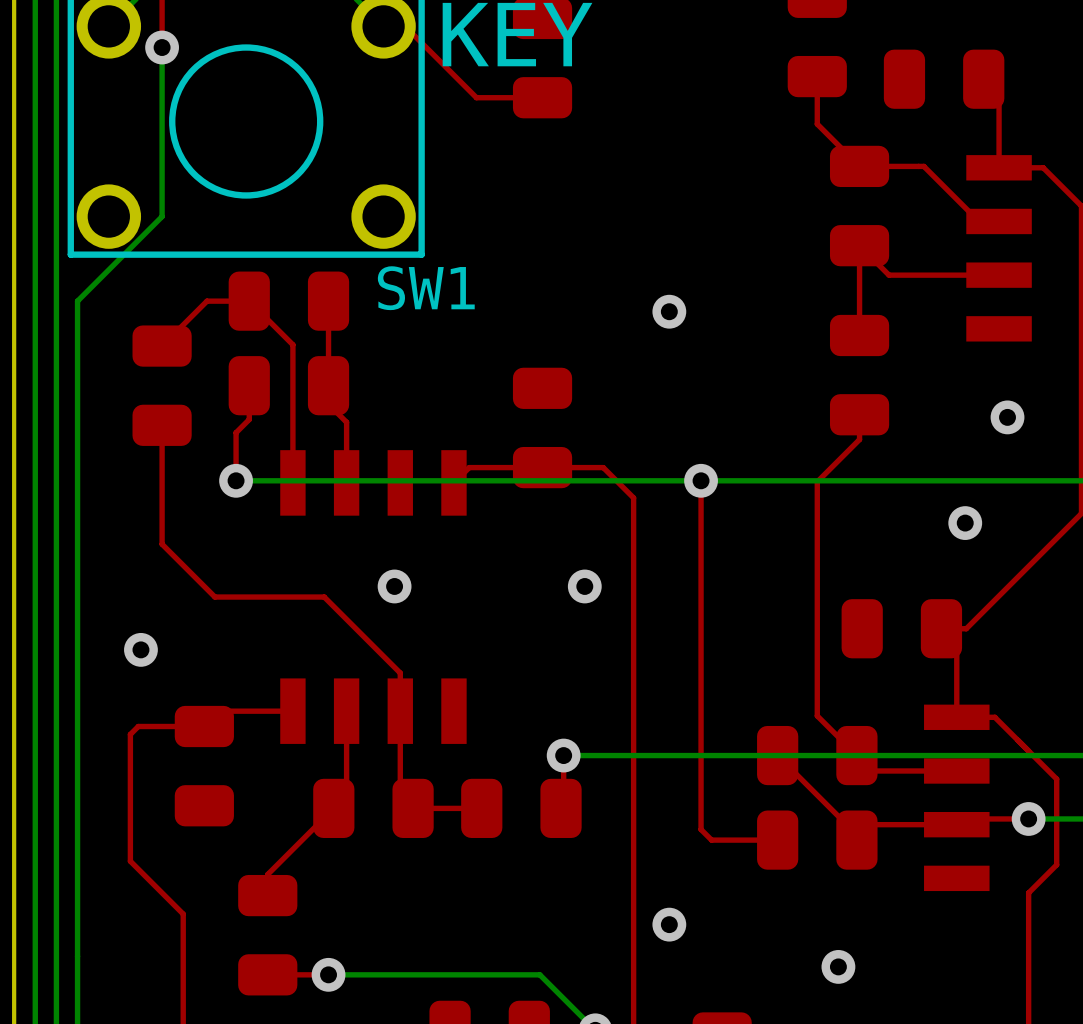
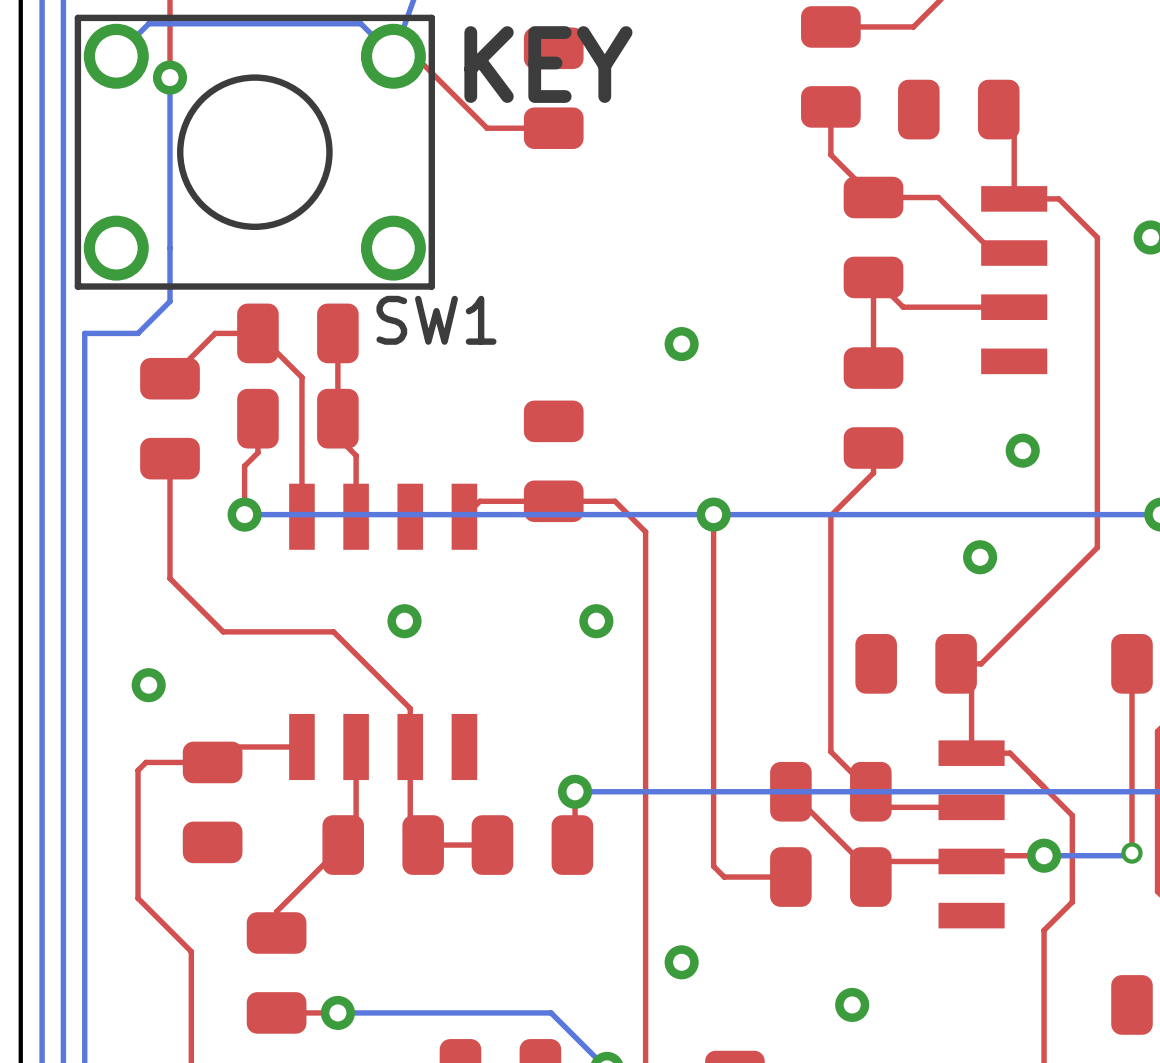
bottom track: (162, 216) (77, 301) -> (170, 248) (170, 301) (138, 333) (84, 333)

